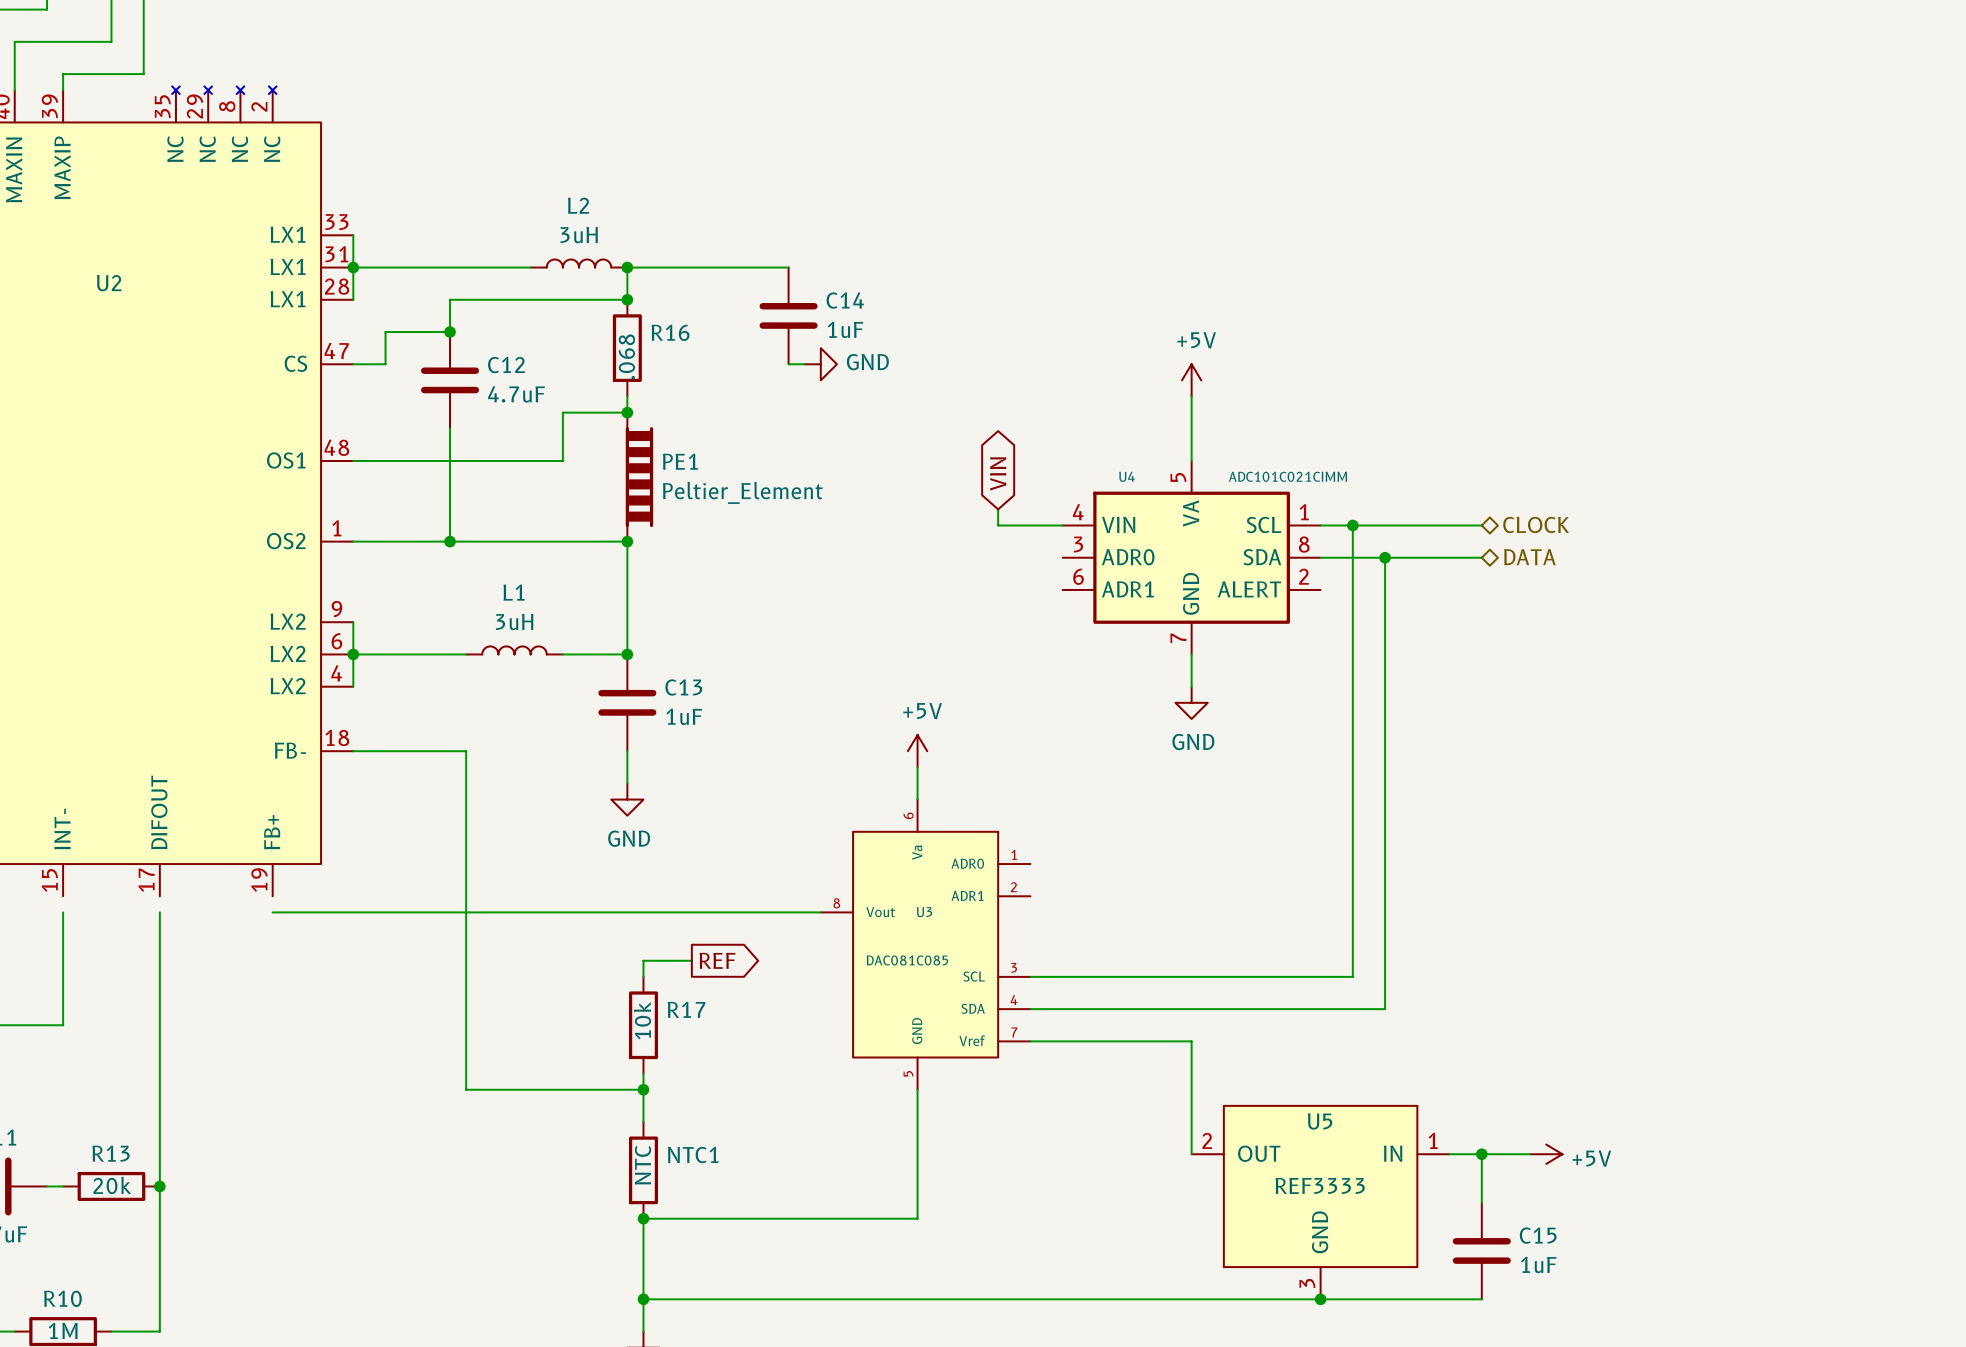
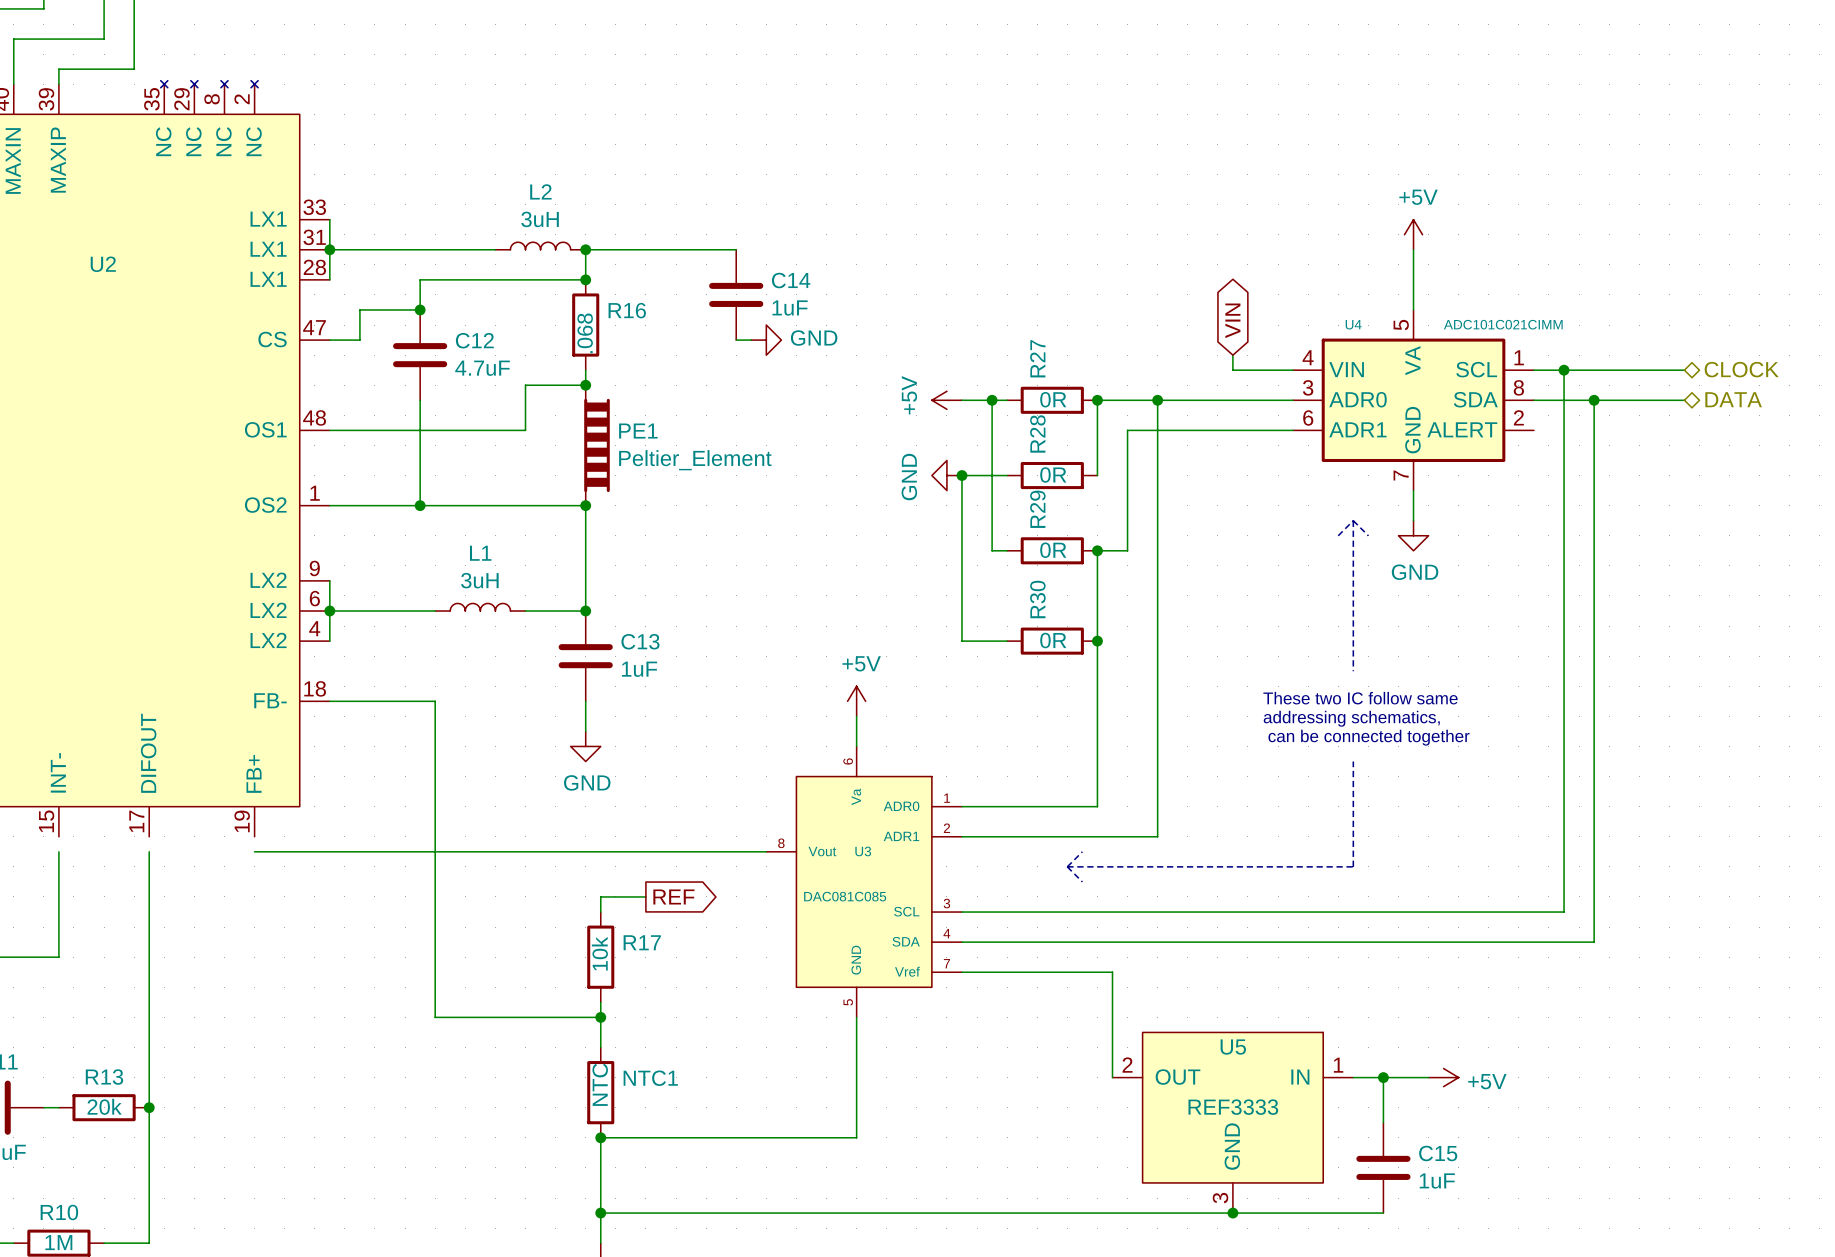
power symbol: none -> +5V (1413, 234)
wire: none -> (1413, 249) (1413, 309)
global label: none -> VIN (1232, 320)
power symbol: +5V (1191, 380) -> none
wire: none -> (1232, 355) (1232, 370) (1293, 370)
wire: (1191, 396) (1191, 461) -> none
wire: none -> (1533, 370) (1684, 370)
junction: none -> (1564, 370)
hierarchical label: none -> CLOCK (1741, 369)
power symbol: none -> +5V (946, 400)
wire: none -> (961, 400) (1007, 400)
wire: none -> (992, 400) (992, 550) (1007, 550)
junction: none -> (992, 400)
R27: none -> 0R (1052, 400)
junction: none -> (1097, 400)
wire: none -> (1157, 400) (1157, 836) (961, 836)
junction: none -> (1157, 400)
wire: none -> (1293, 400) (1097, 400) (1097, 475)
wire: none -> (1533, 400) (1684, 400)
junction: none -> (1594, 400)
hierarchical label: none -> DATA (1733, 399)
wire: none -> (1293, 430) (1127, 430) (1127, 550) (1097, 550) (1097, 806) (961, 806)
global label: VIN (998, 473) -> none
wire: (998, 509) (998, 525) (1062, 525) -> none
power symbol: none -> GND (946, 475)
junction: none -> (961, 475)
wire: none -> (1007, 475) (961, 475) (961, 641) (1007, 641)
R28: none -> 0R (1052, 475)
hierarchical label: CLOCK (1536, 524) -> none
wire: (1320, 525) (1481, 525) -> none
wire: (1352, 525) (1352, 976) -> (1564, 370) (1564, 912) (1263, 912)
junction: (1352, 525) -> none
wire: none -> (1413, 490) (1413, 520)
U4 position: (1191, 557) -> (1413, 400)
wire: (1320, 557) (1481, 557) -> none
wire: (1385, 557) (1385, 1009) -> (1594, 400) (1594, 942) (1293, 942)
junction: (1385, 557) -> none
line: none -> (1353, 520) (1353, 671)
line: none -> (1353, 520) (1338, 535)
line: none -> (1353, 520) (1368, 535)
hierarchical label: DATA (1529, 557) -> none
power symbol: none -> GND (1413, 535)
R29: none -> 0R (1052, 550)
junction: none -> (1097, 550)
wire: (1191, 654) (1191, 686) -> none
R30: none -> 0R (1052, 641)
junction: none -> (1097, 641)
power symbol: GND (1191, 702) -> none
text: none -> These two IC follow same (1360, 698)
text: none -> addressing schematics, (1351, 718)
text: none -> can be connected together (1369, 737)
line: none -> (1353, 761) (1353, 866) (1067, 866)
line: none -> (1082, 851) (1067, 866)
line: none -> (1067, 866) (1082, 881)

